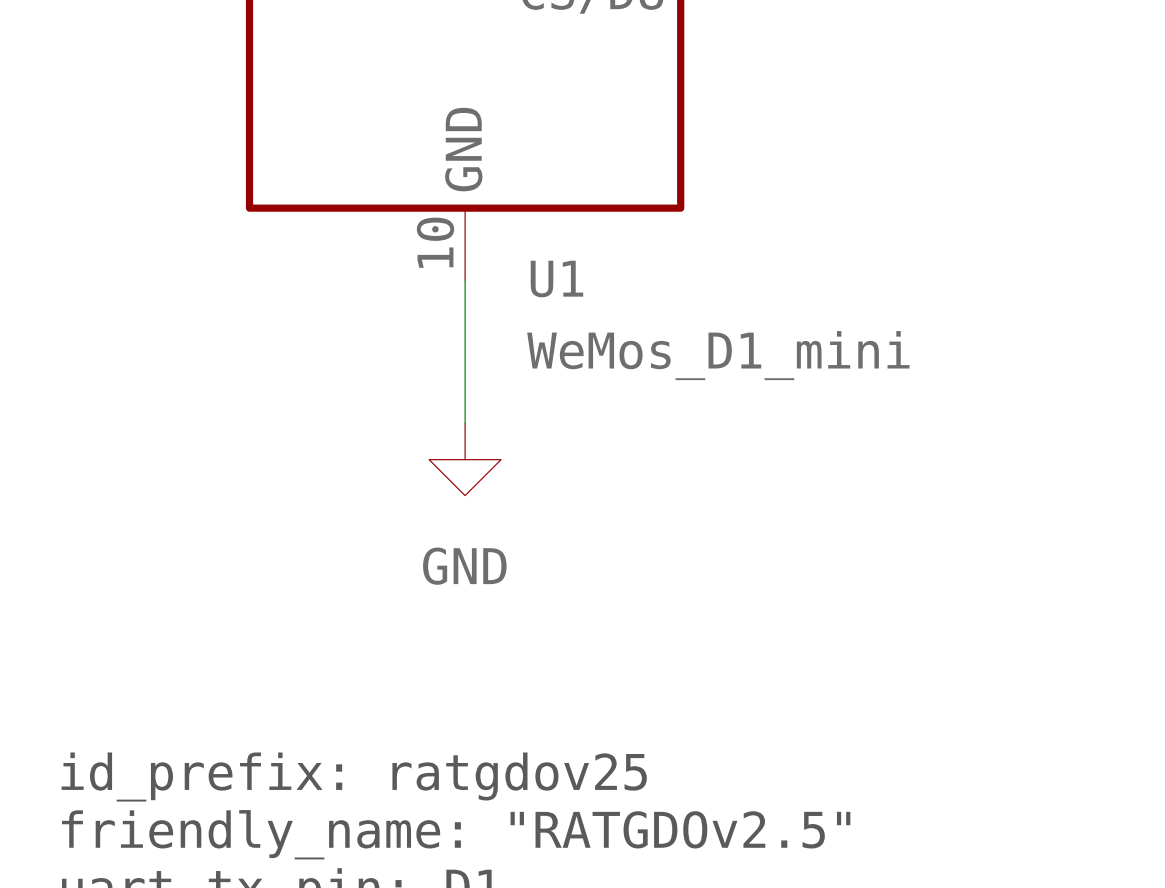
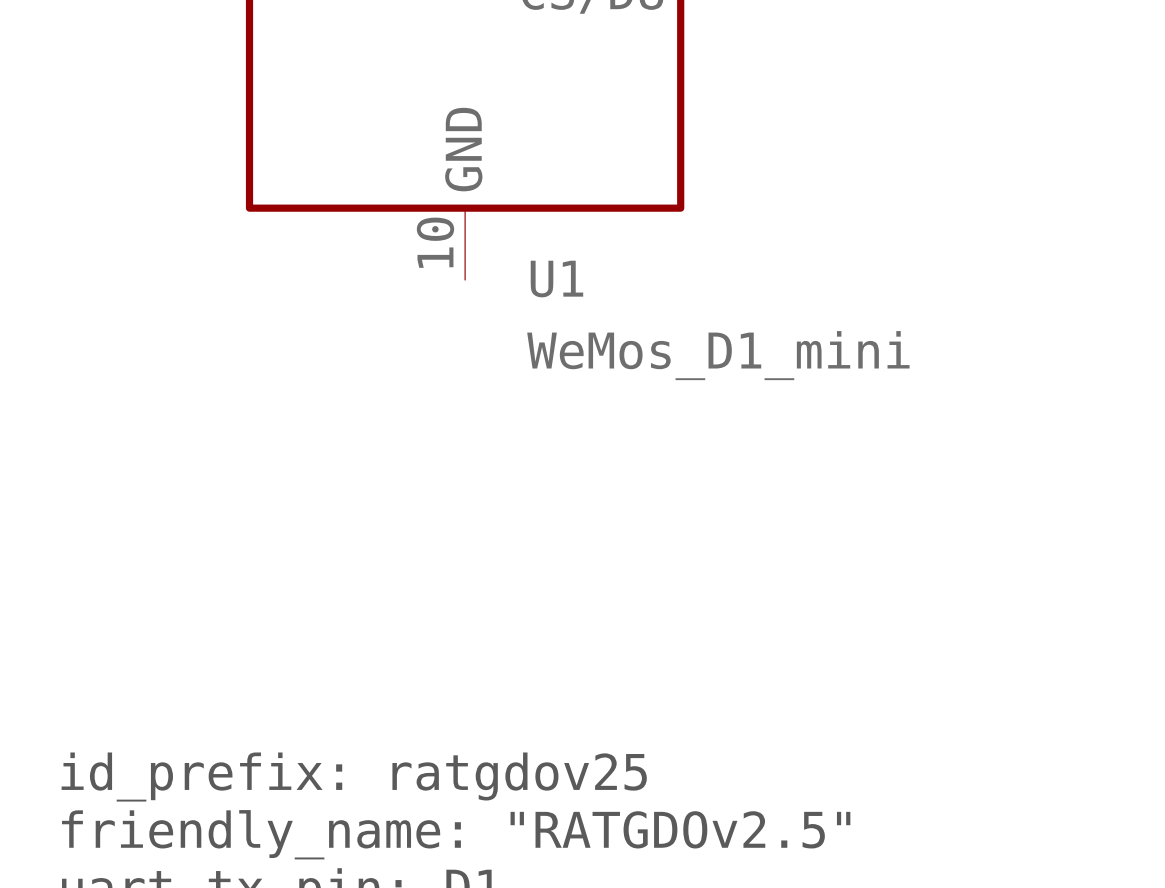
wire: (465, 280) (465, 423) -> none
power symbol: GND (465, 459) -> none

